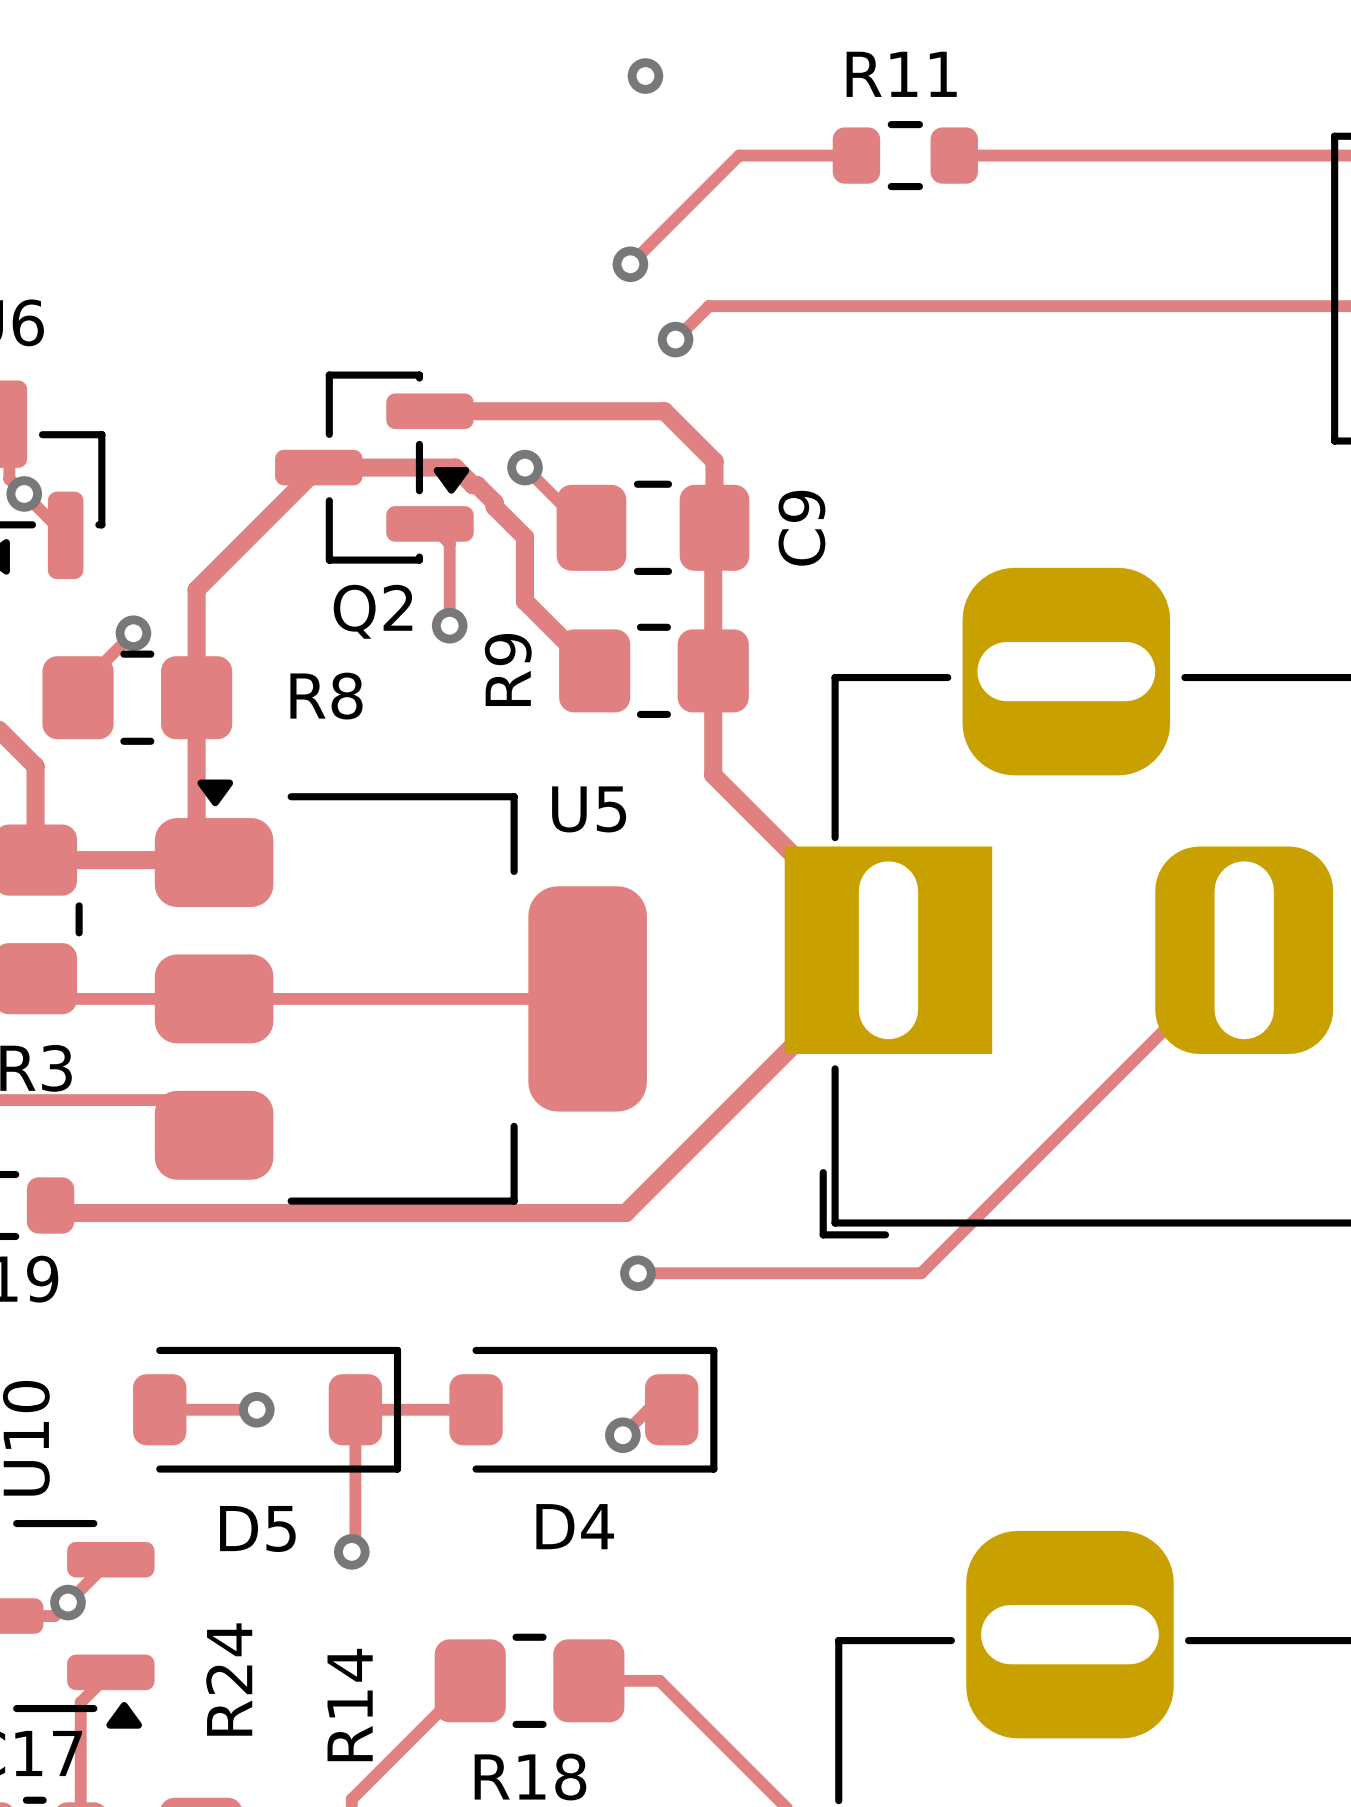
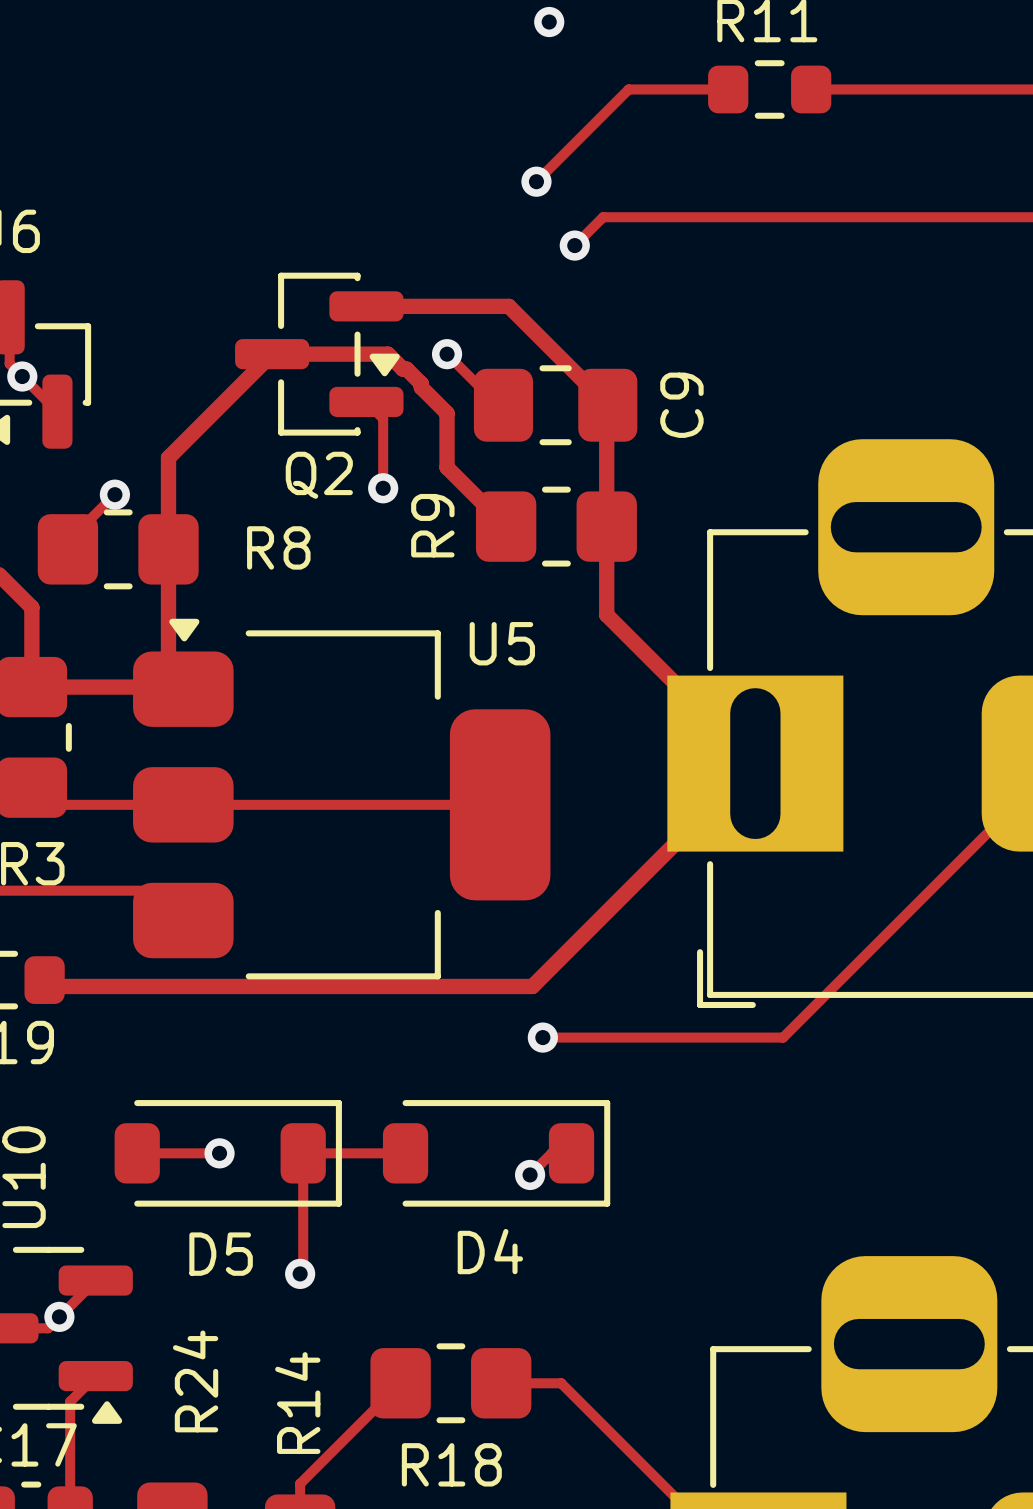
track: (597, 411) (664, 411) (714, 461) (714, 527) -> (508, 306) (607, 405)

